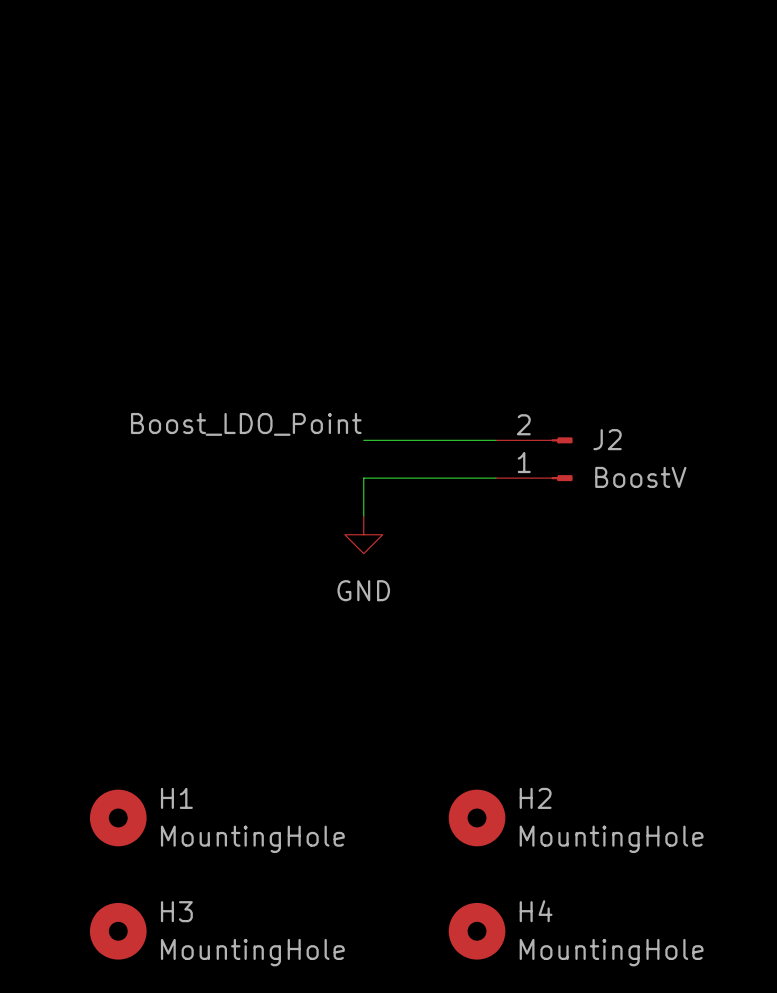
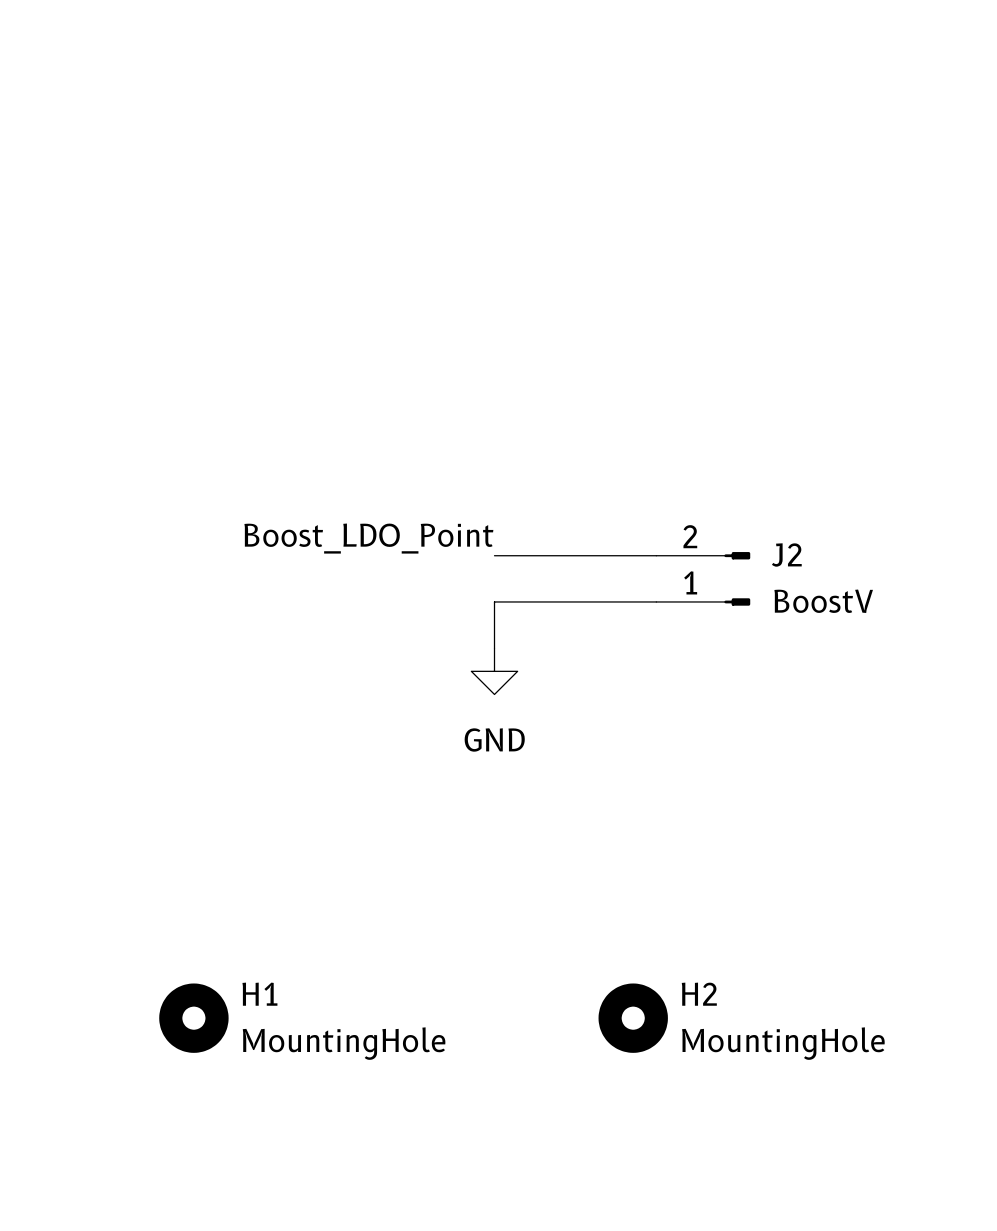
H3: MountingHole (118, 931) -> none
H4: MountingHole (477, 931) -> none

